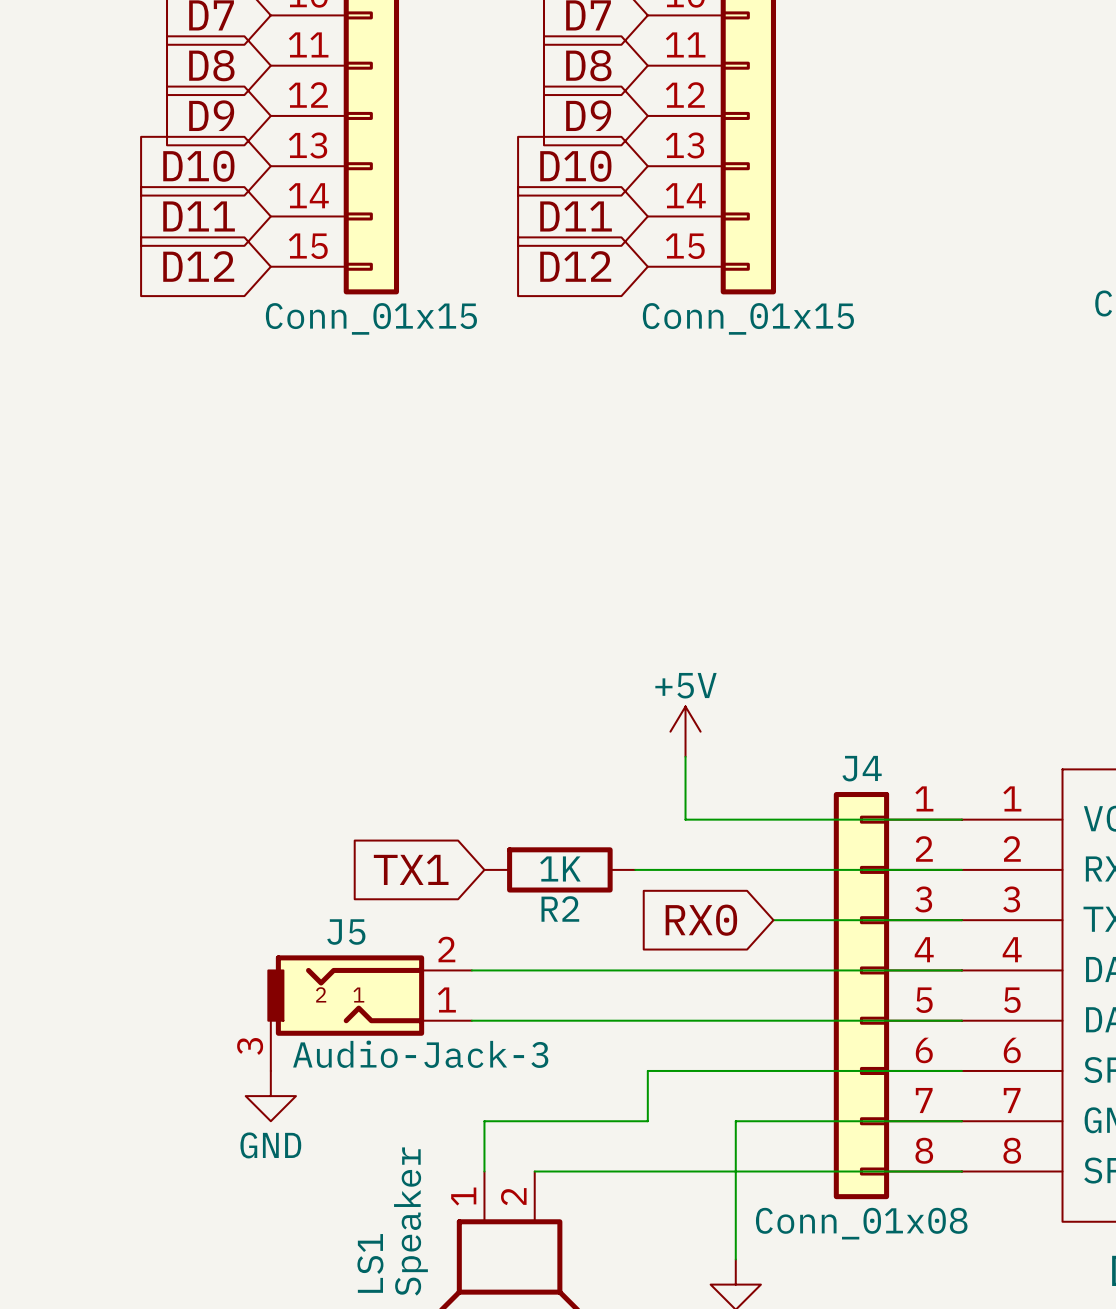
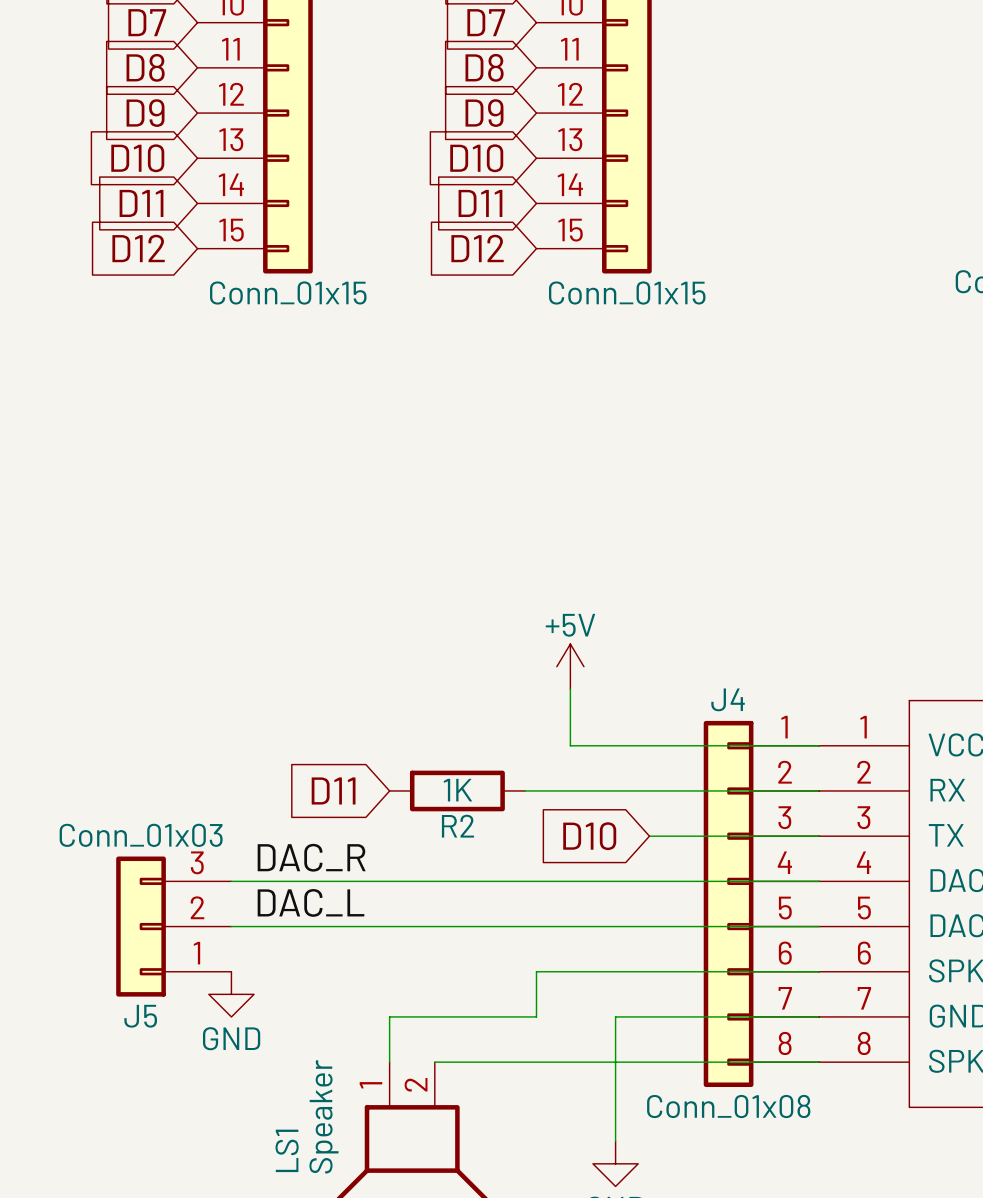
global label: TX1 (411, 869) -> D11 (333, 790)
global label: RX0 (701, 920) -> D10 (589, 836)
J5 name position: J5 (346, 932) -> J5 (140, 1016)
label: none -> DAC_R (311, 857)
J5 symbol: [268, 955, 472, 1071] -> [116, 856, 232, 997]
label: none -> DAC_L (311, 902)
J5 value: Audio-Jack-3 (420, 1054) -> Conn_01x03 (141, 835)
power symbol position: GND (270, 1096) -> GND (231, 994)

